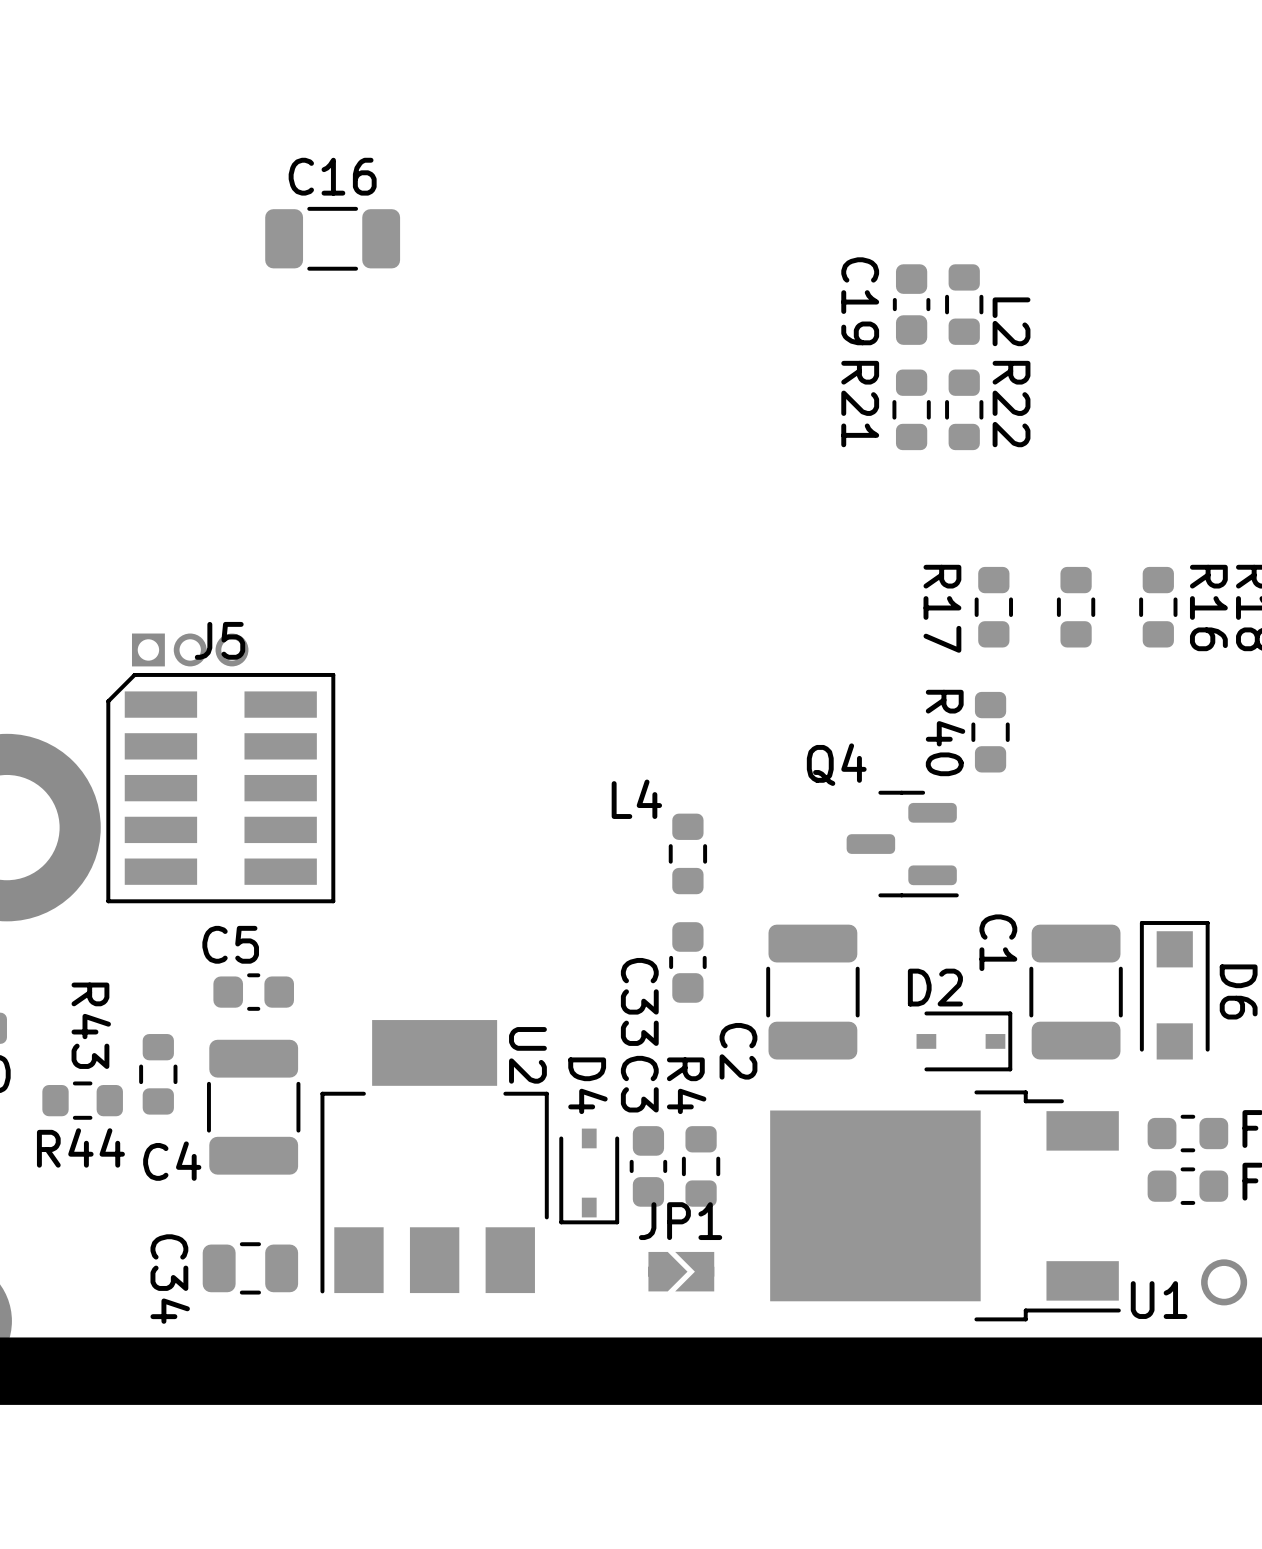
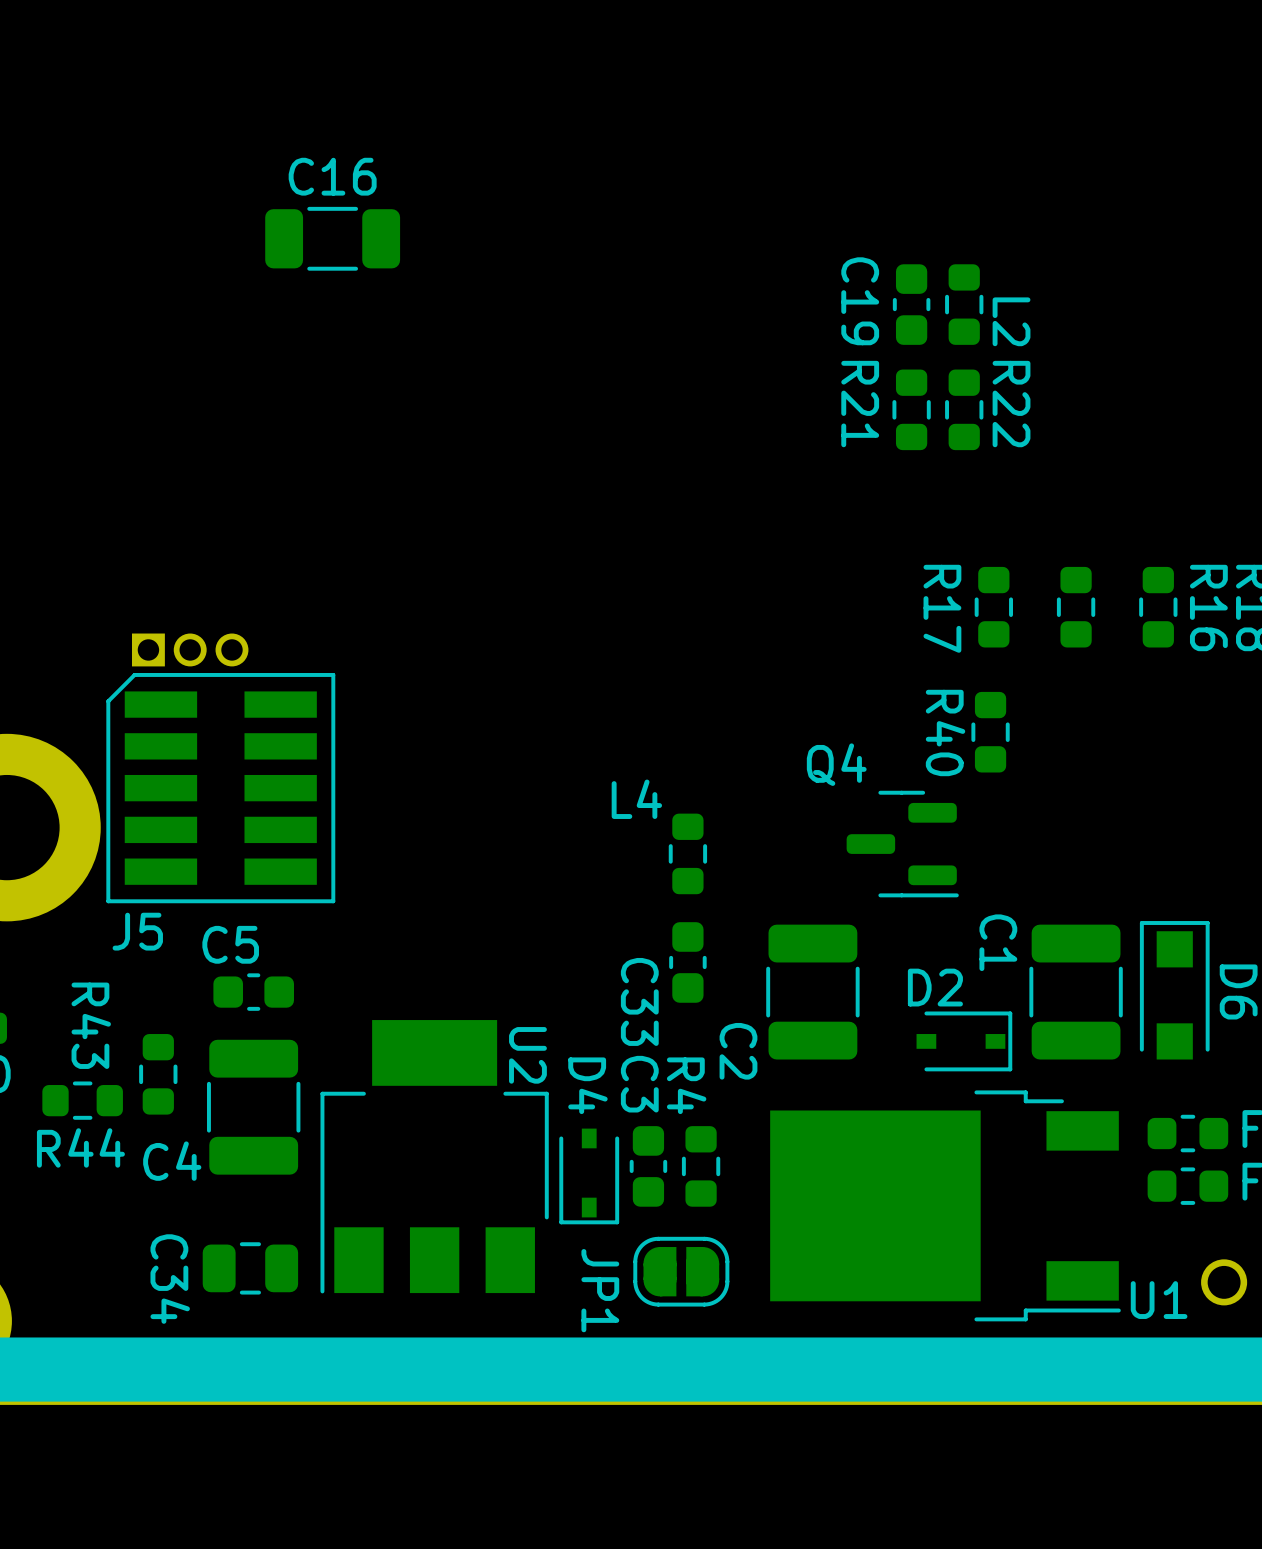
J5 name position: J5 (220, 640) -> J5 (137, 931)
JP1 name position: JP1 (680, 1221) -> JP1 (600, 1290)
JP1 footprint: [648, 1251, 715, 1292] -> [633, 1236, 730, 1307]

